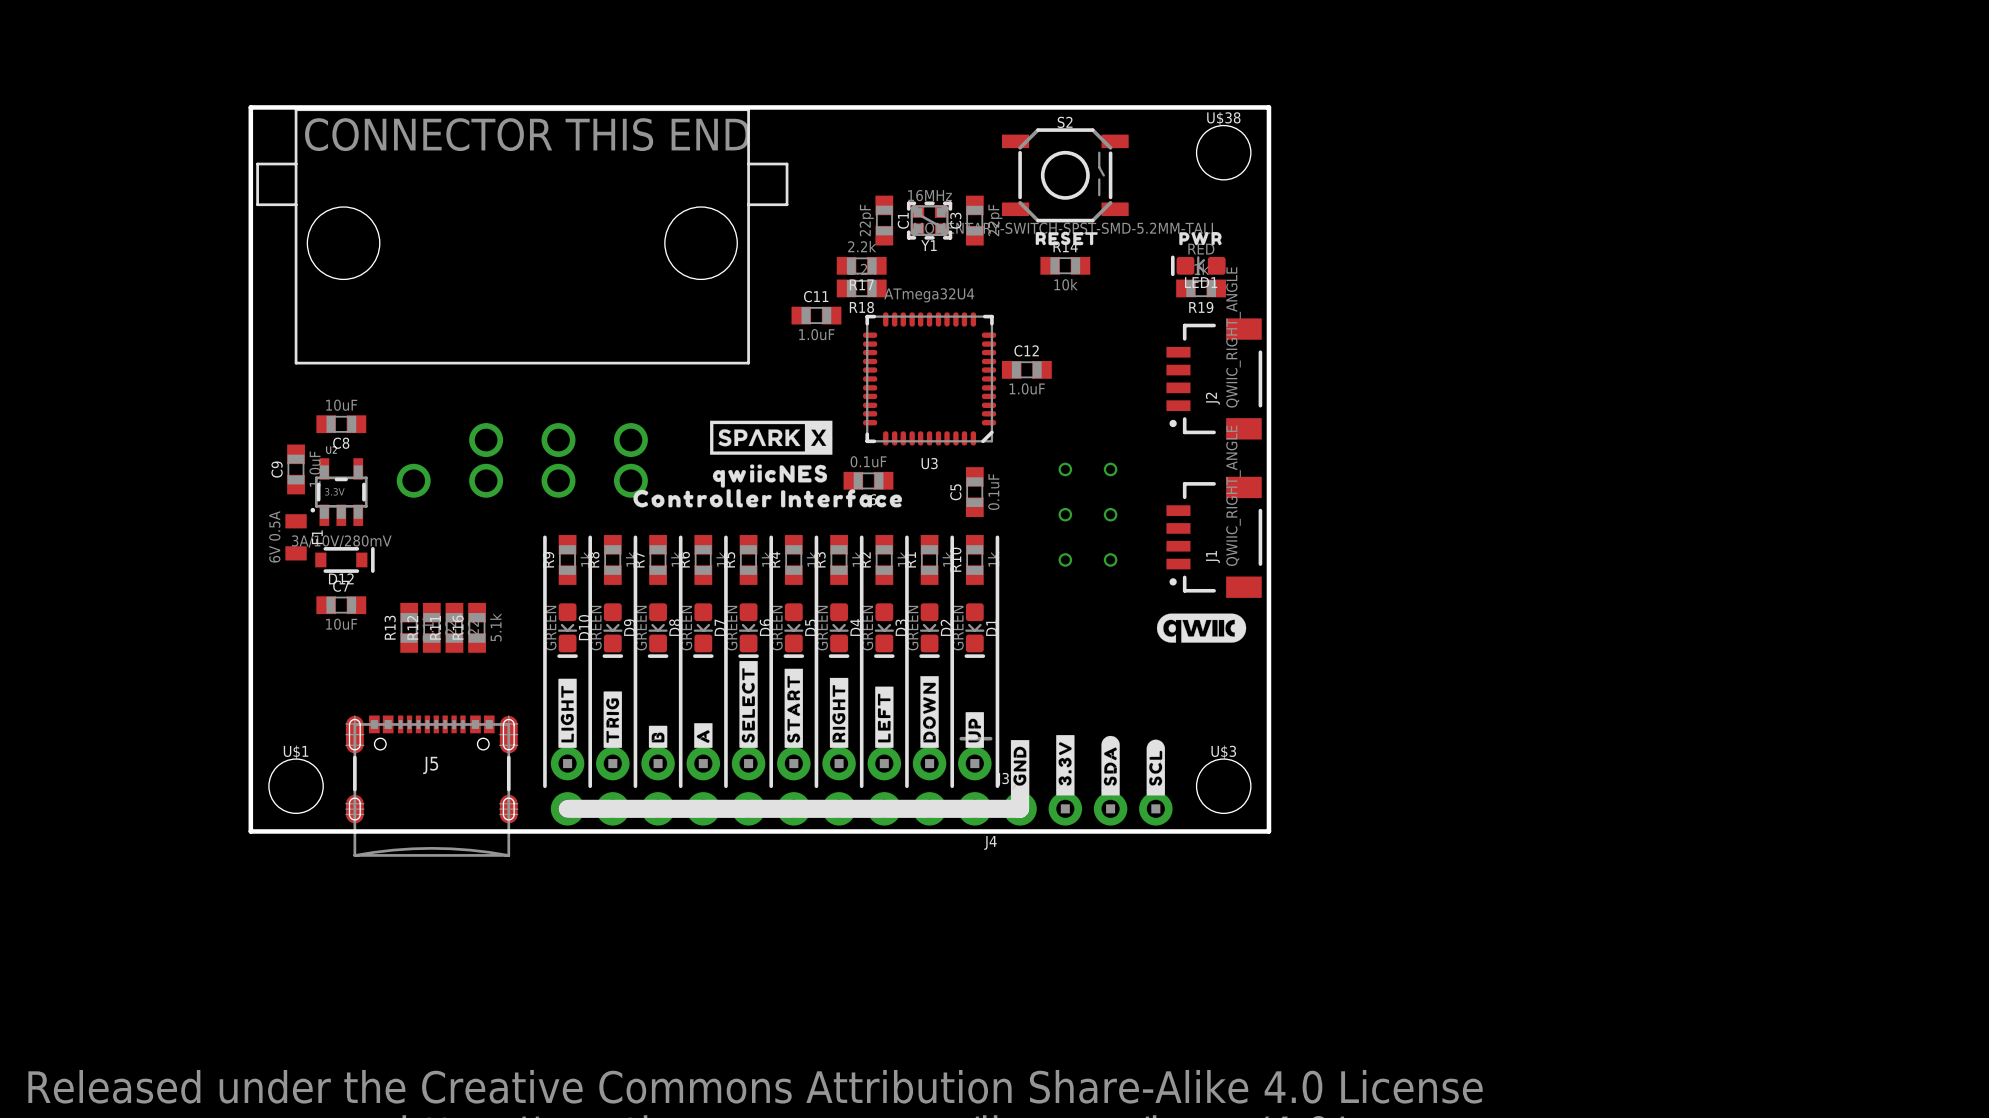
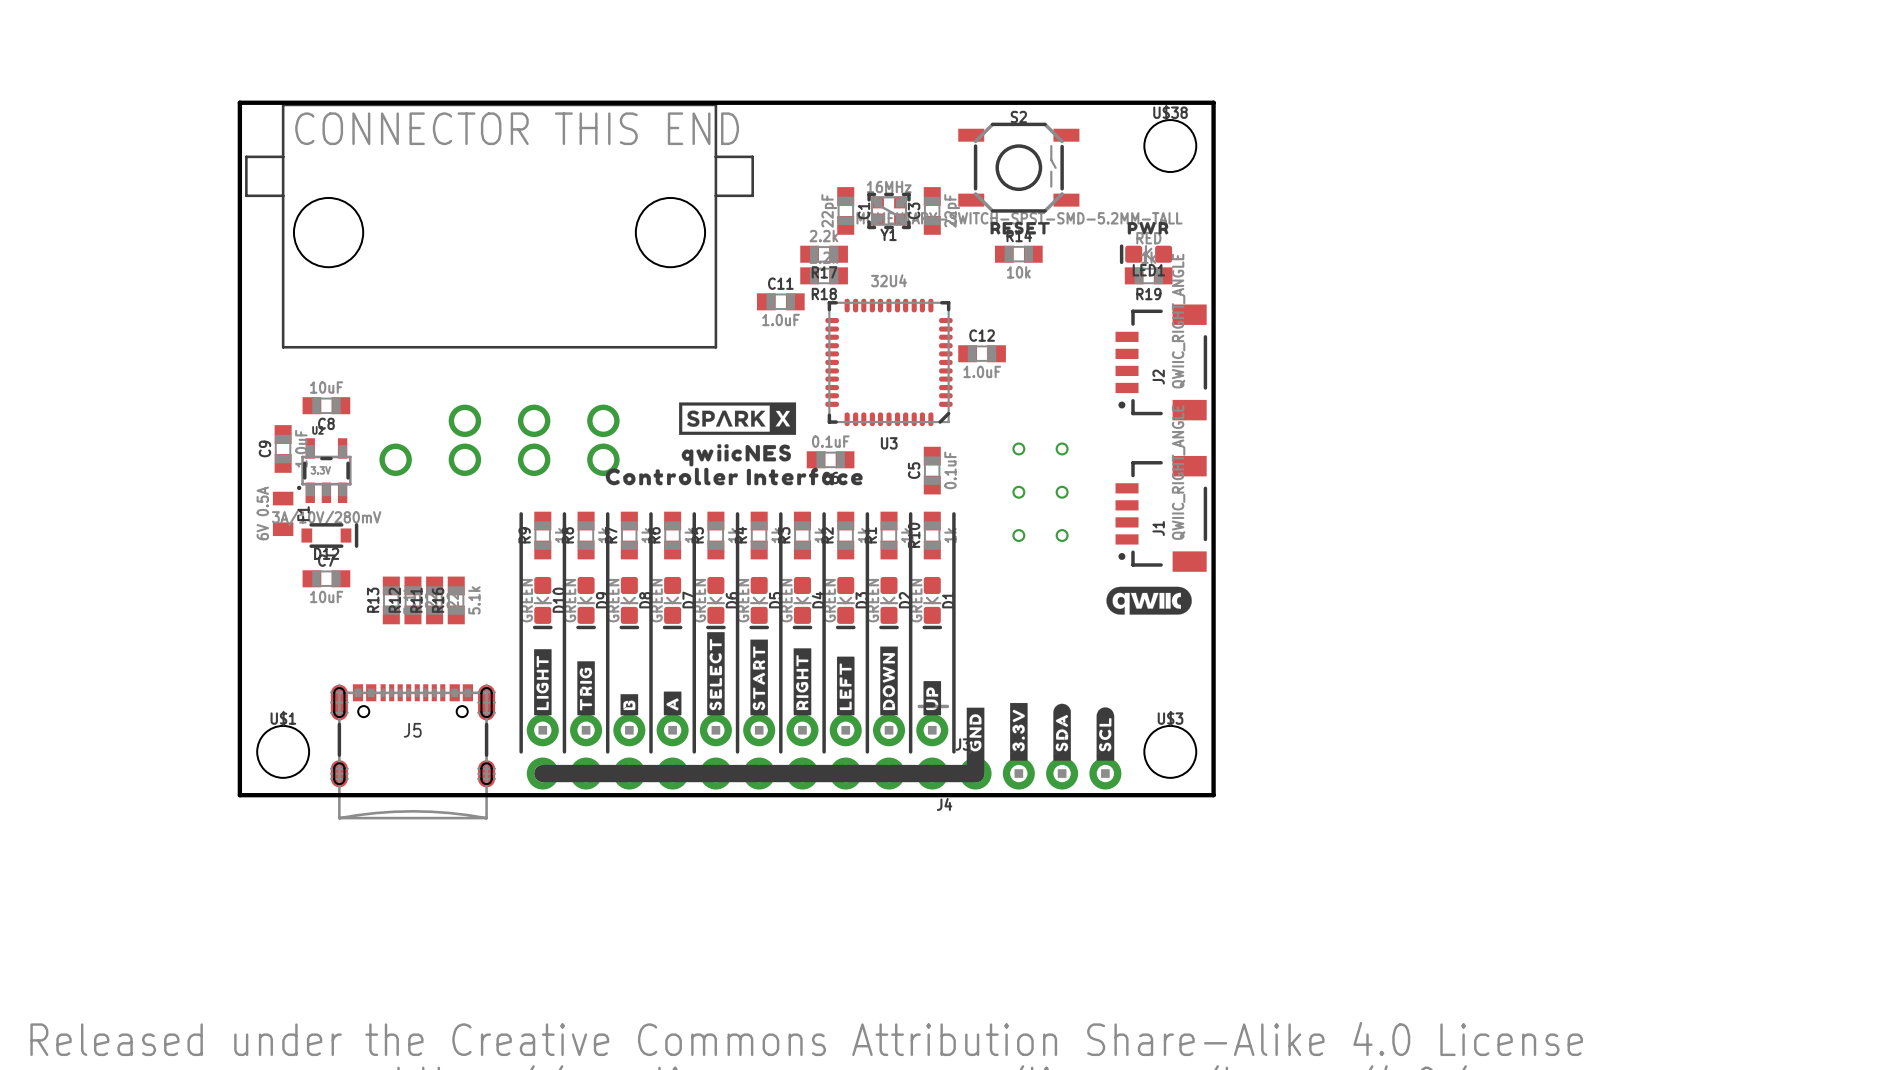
U3 value: ATmega32U4 (929, 295) -> 32U4 (889, 280)

